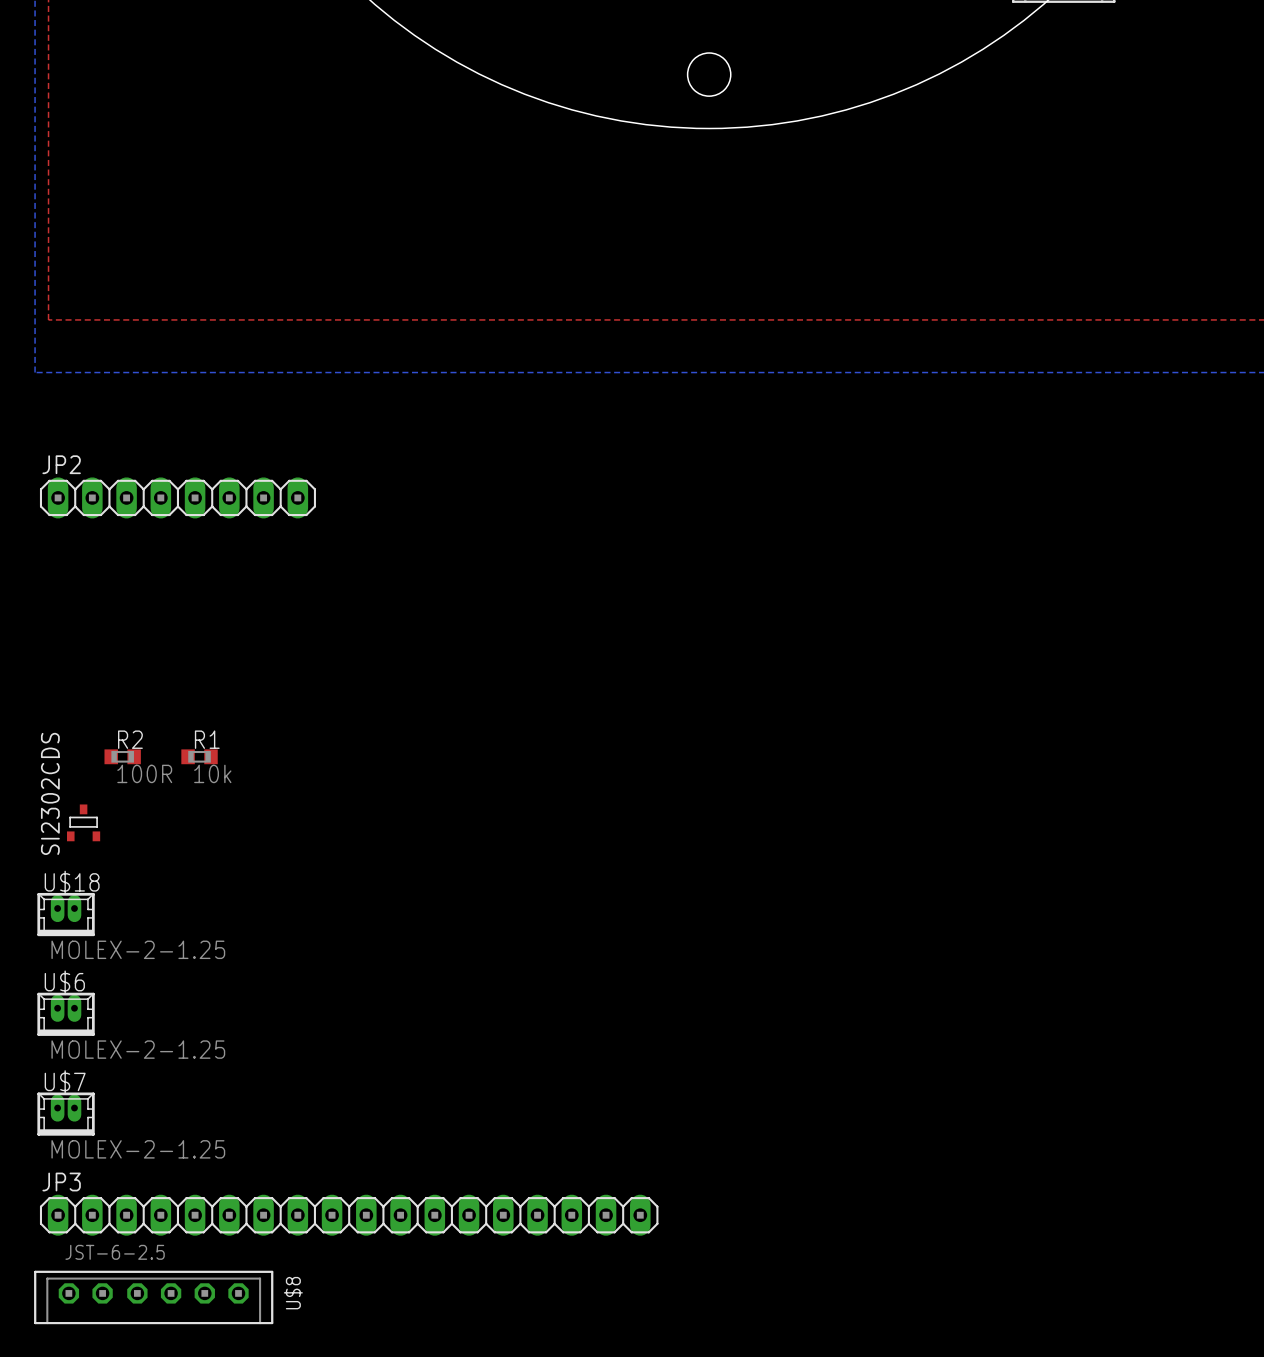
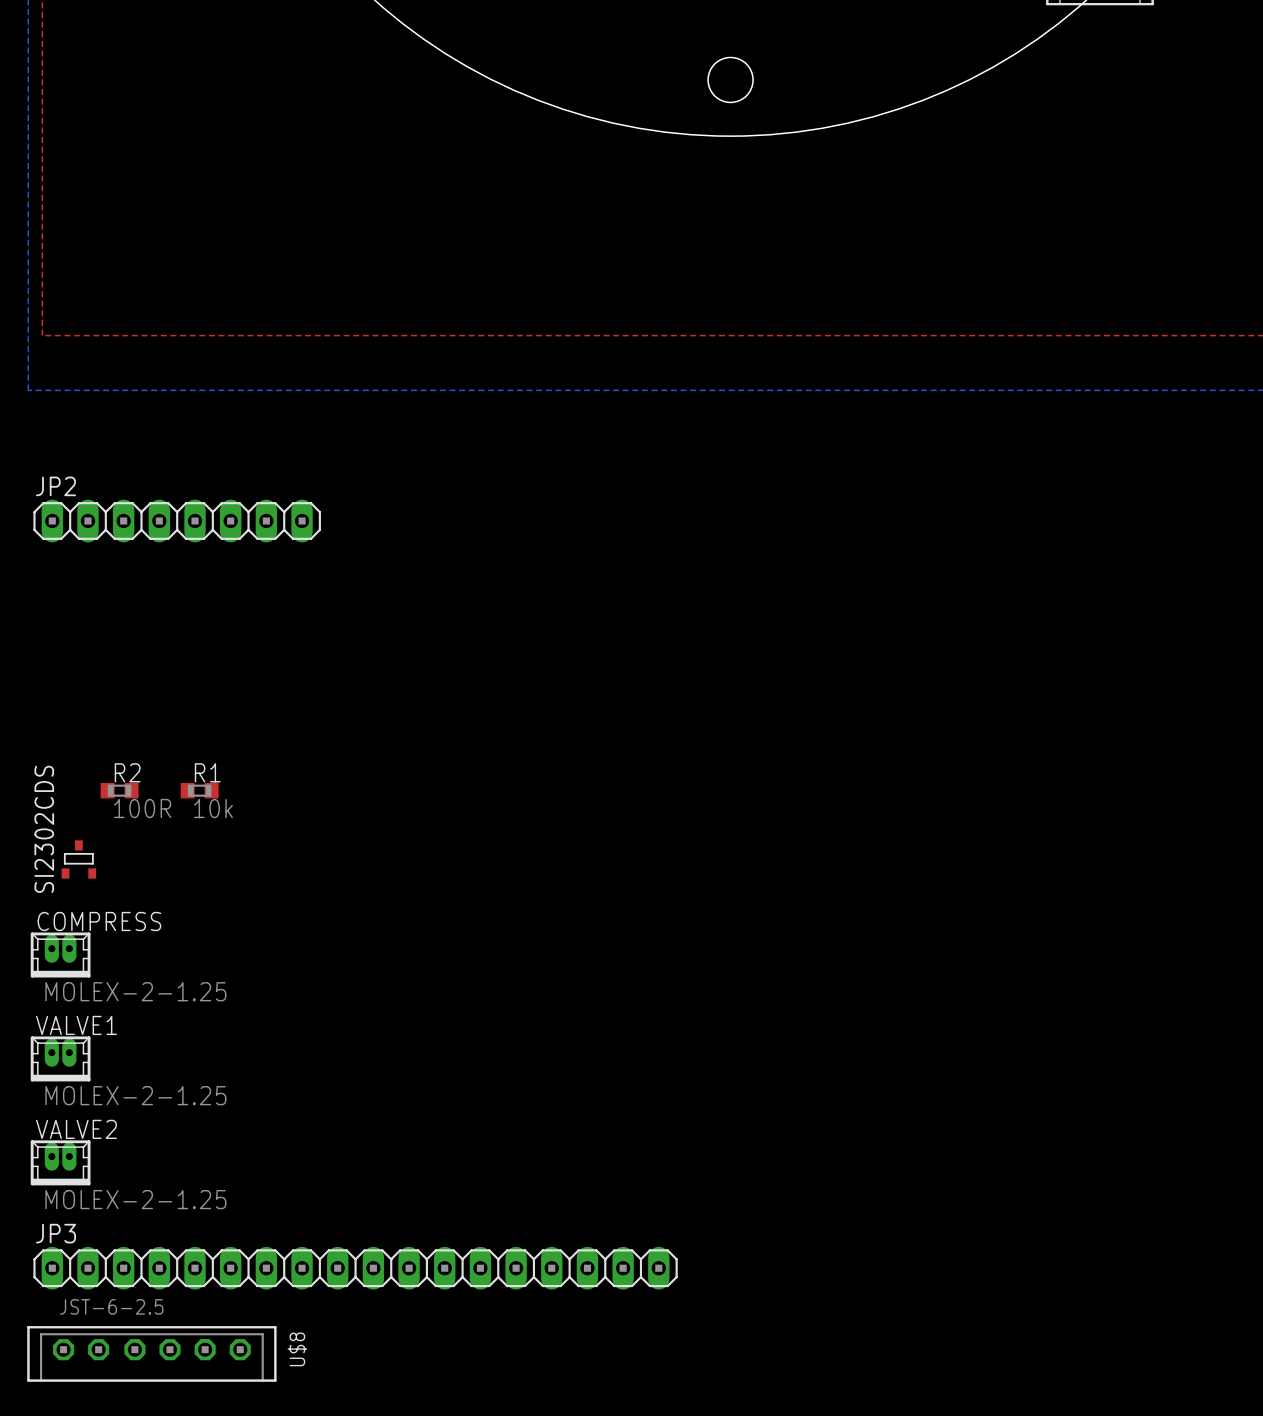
U$18 name: U$18 (72, 882) -> COMPRESS (99, 921)
U$6 name: U$6 (64, 982) -> VALVE1 (76, 1025)
U$7 name: U$7 (65, 1081) -> VALVE2 (76, 1129)

